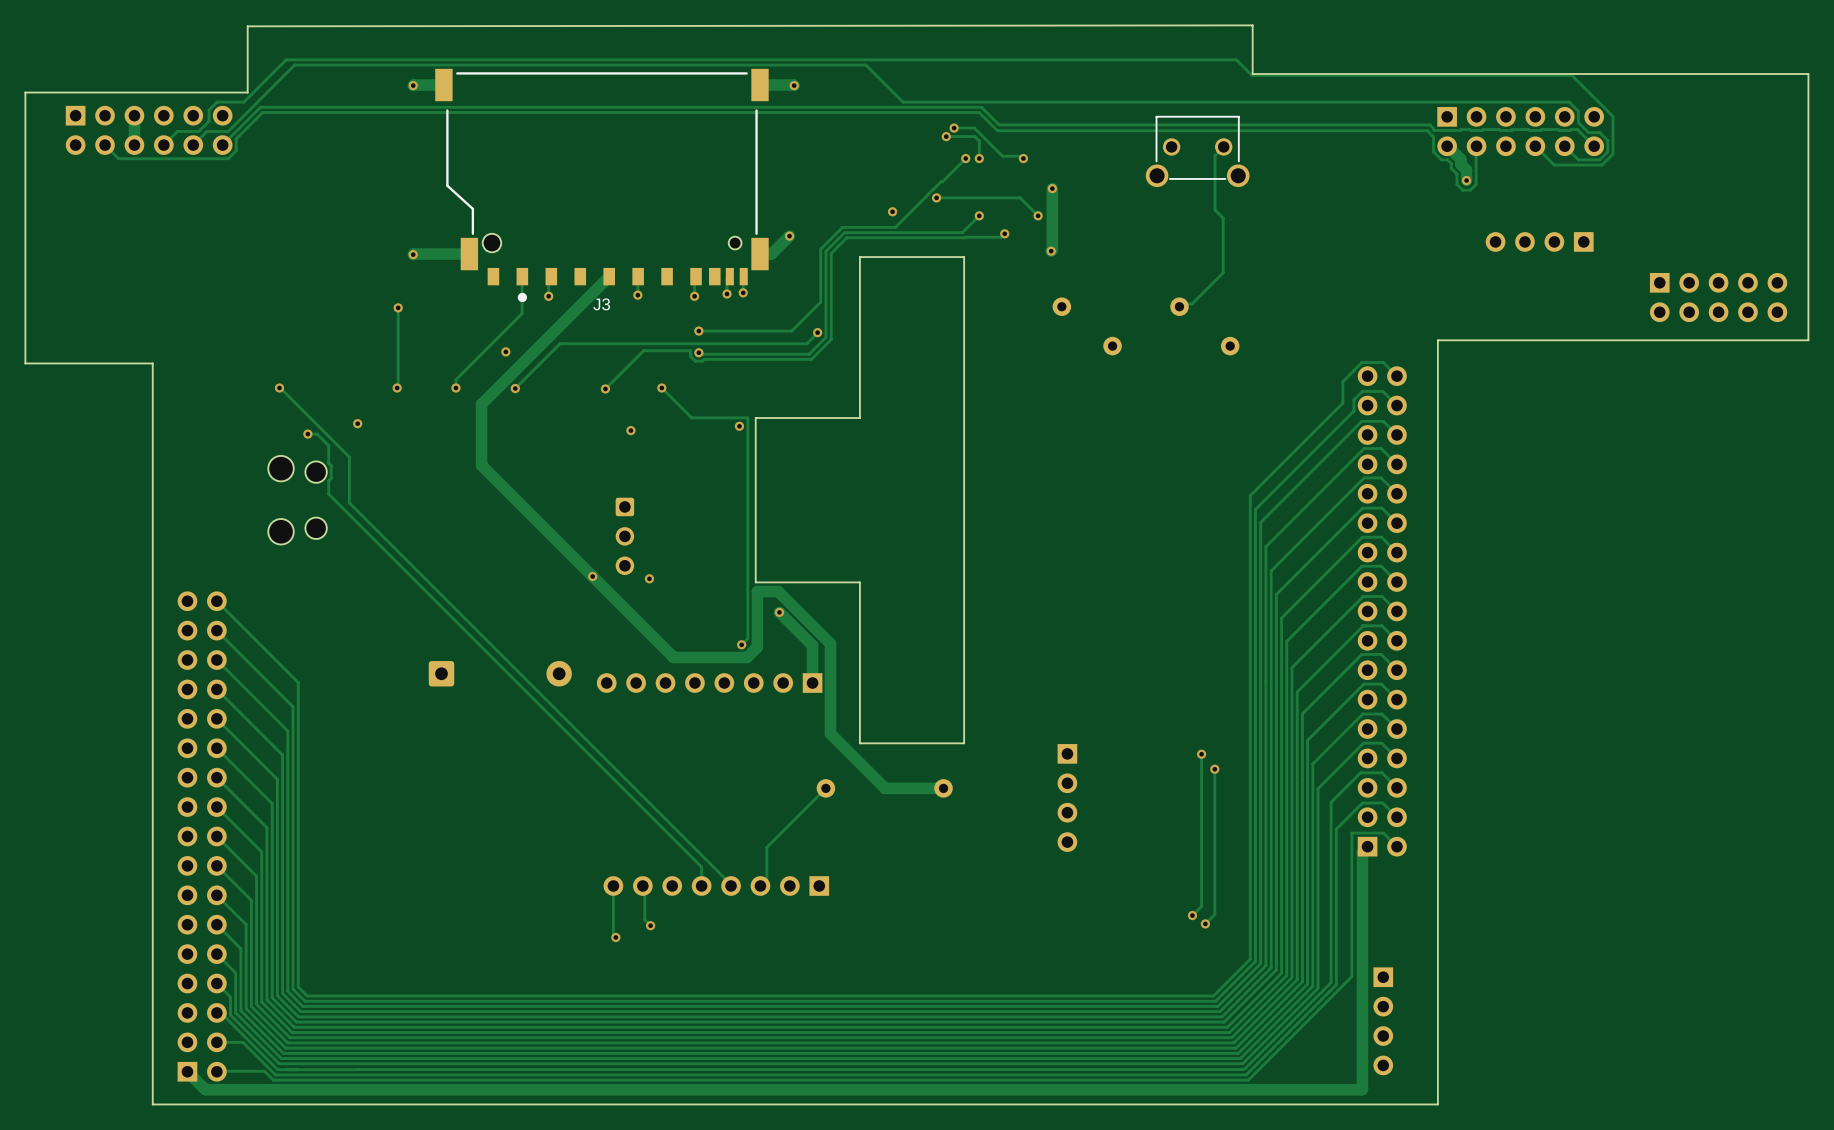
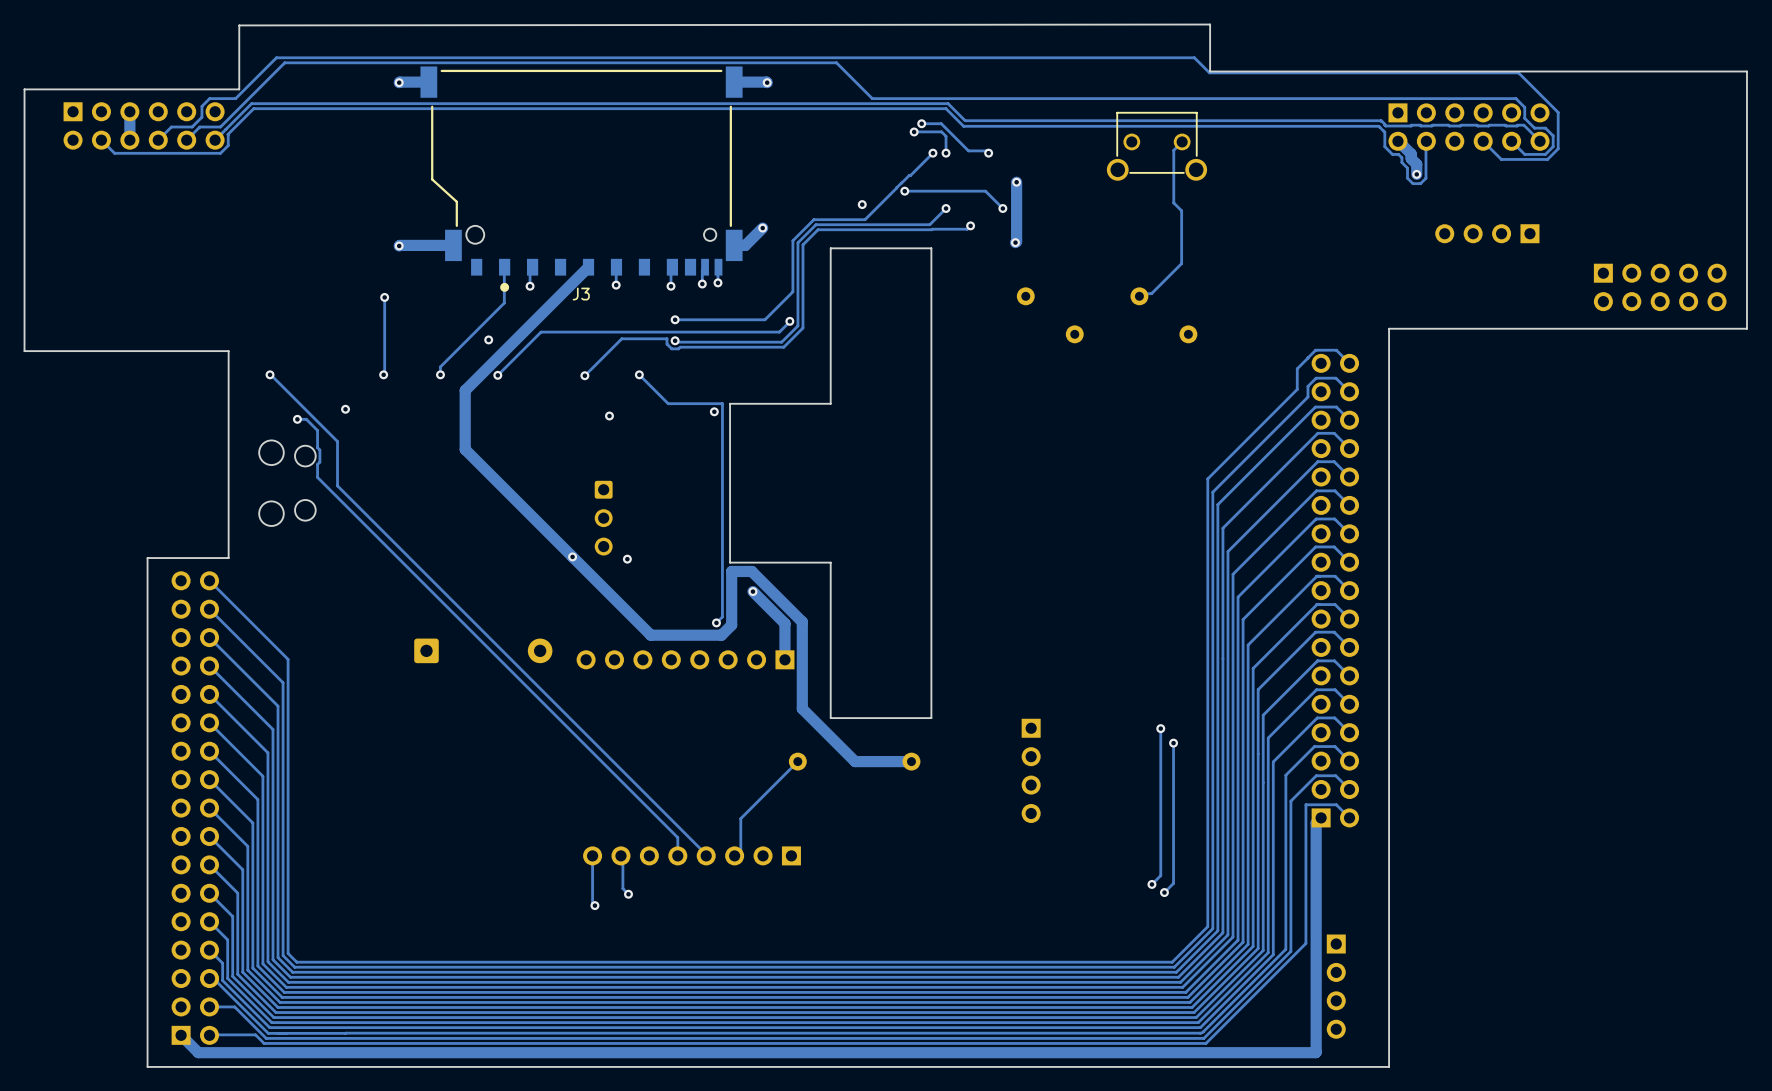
board edge: (152, 363) (152, 577) -> (147, 351) (228, 351) (228, 558) (147, 558)

